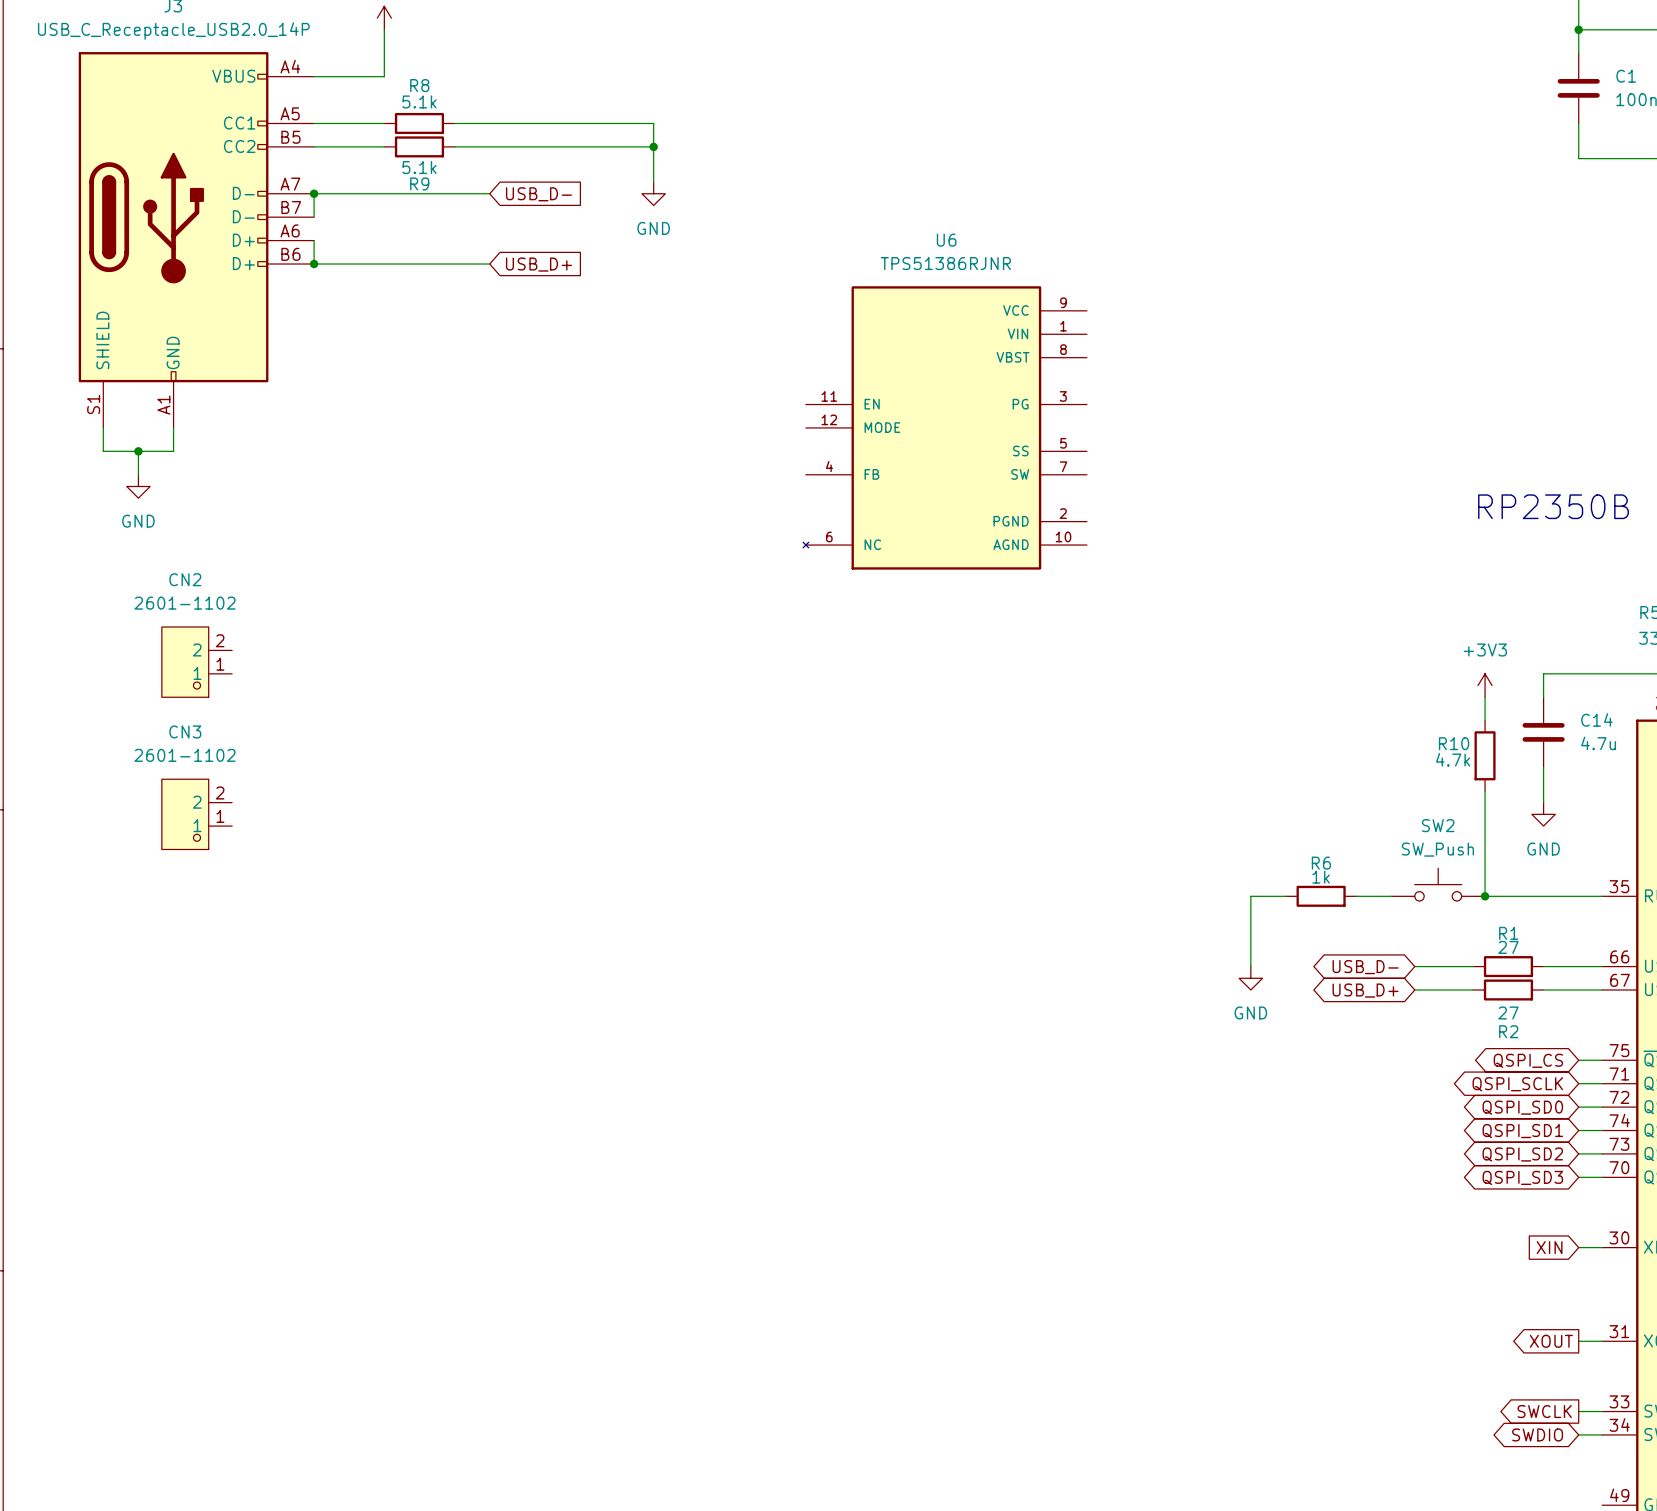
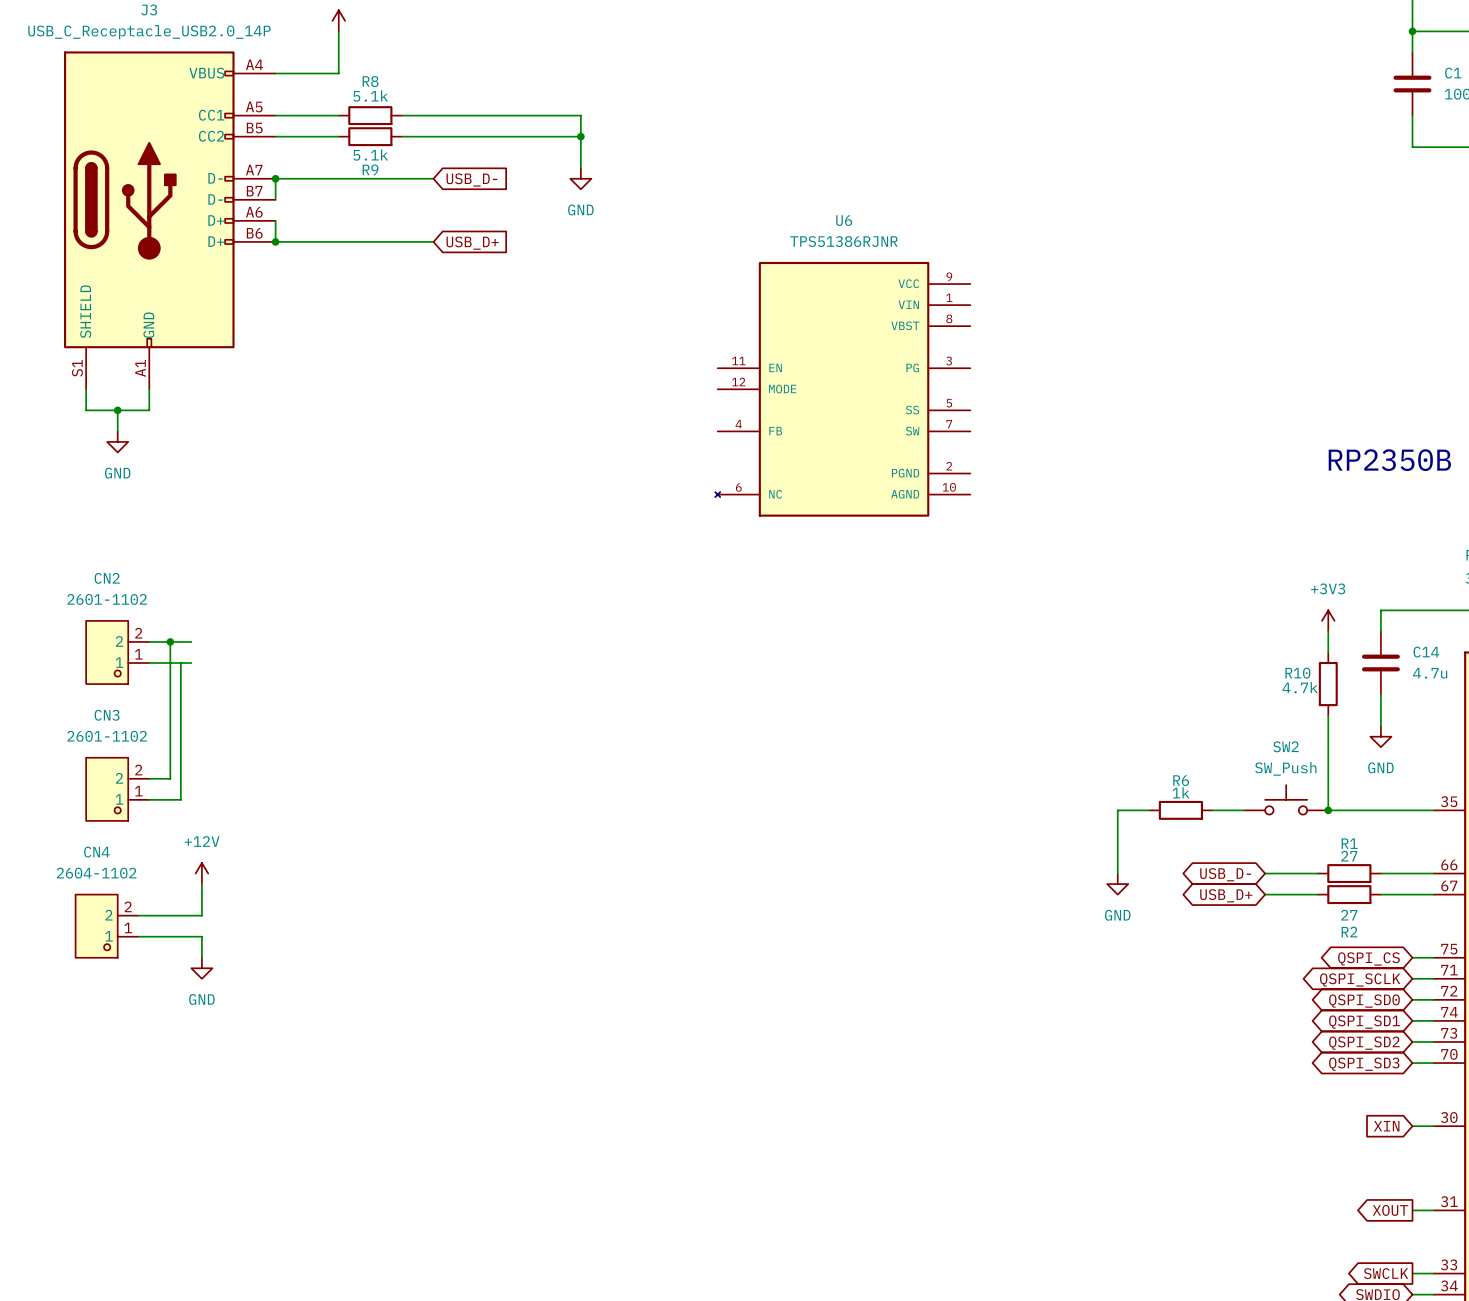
CN2 position: (196, 662) -> (117, 652)
wire: none -> (149, 641) (191, 641)
wire: none -> (170, 641) (170, 778) (149, 778)
junction: none -> (170, 641)
wire: none -> (149, 663) (191, 663)
wire: none -> (180, 663) (180, 799) (149, 799)
CN3 position: (196, 814) -> (117, 789)
power symbol: none -> +12V (201, 873)
wire: none -> (201, 884) (201, 915) (138, 915)
CN4: none -> 2604-1102 (107, 926)
wire: none -> (138, 936) (201, 936) (201, 957)
power symbol: none -> GND (201, 968)

